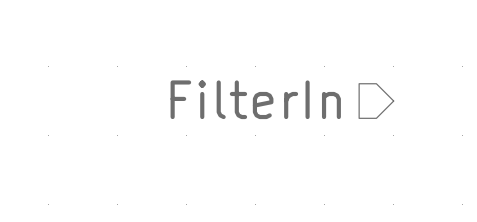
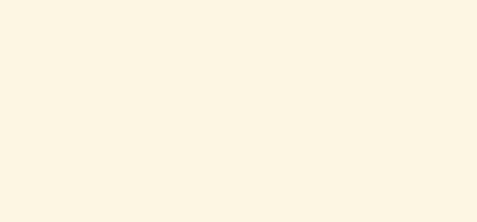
hierarchical label: FilterIn (255, 99) -> none

